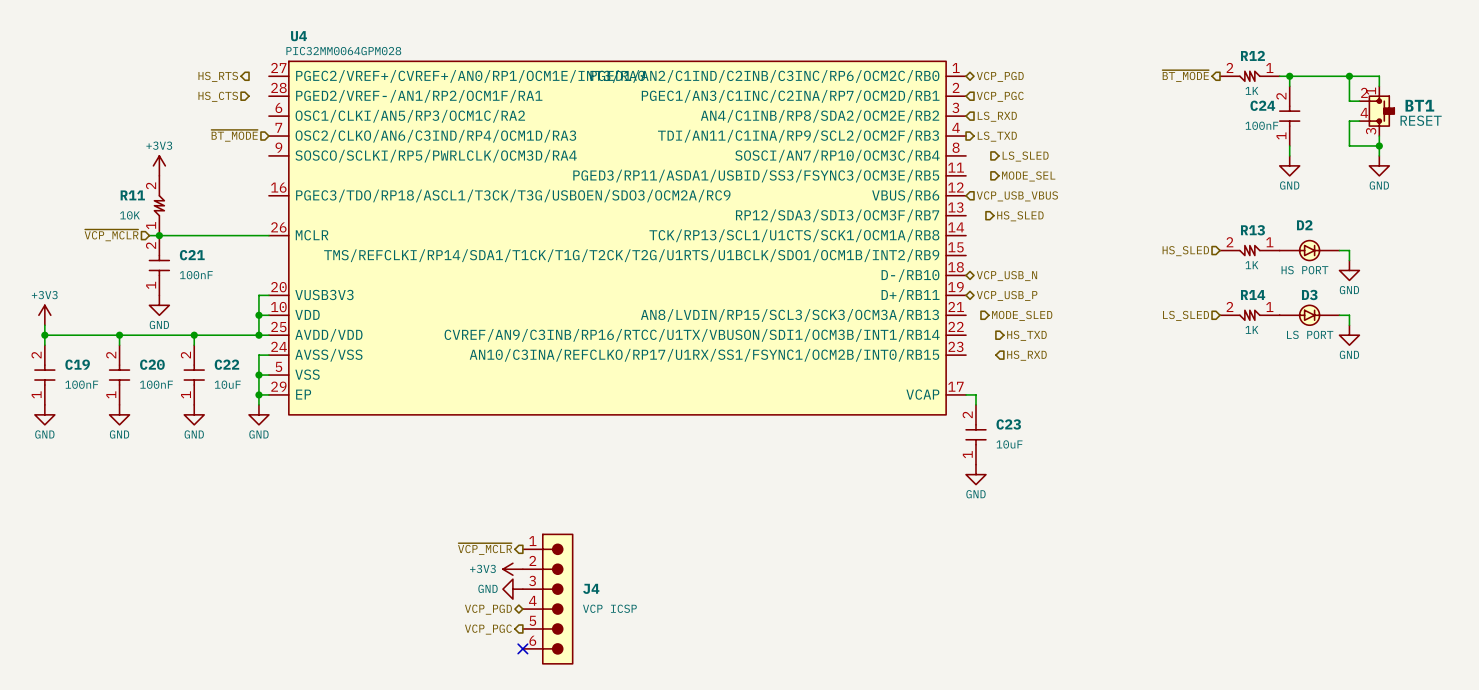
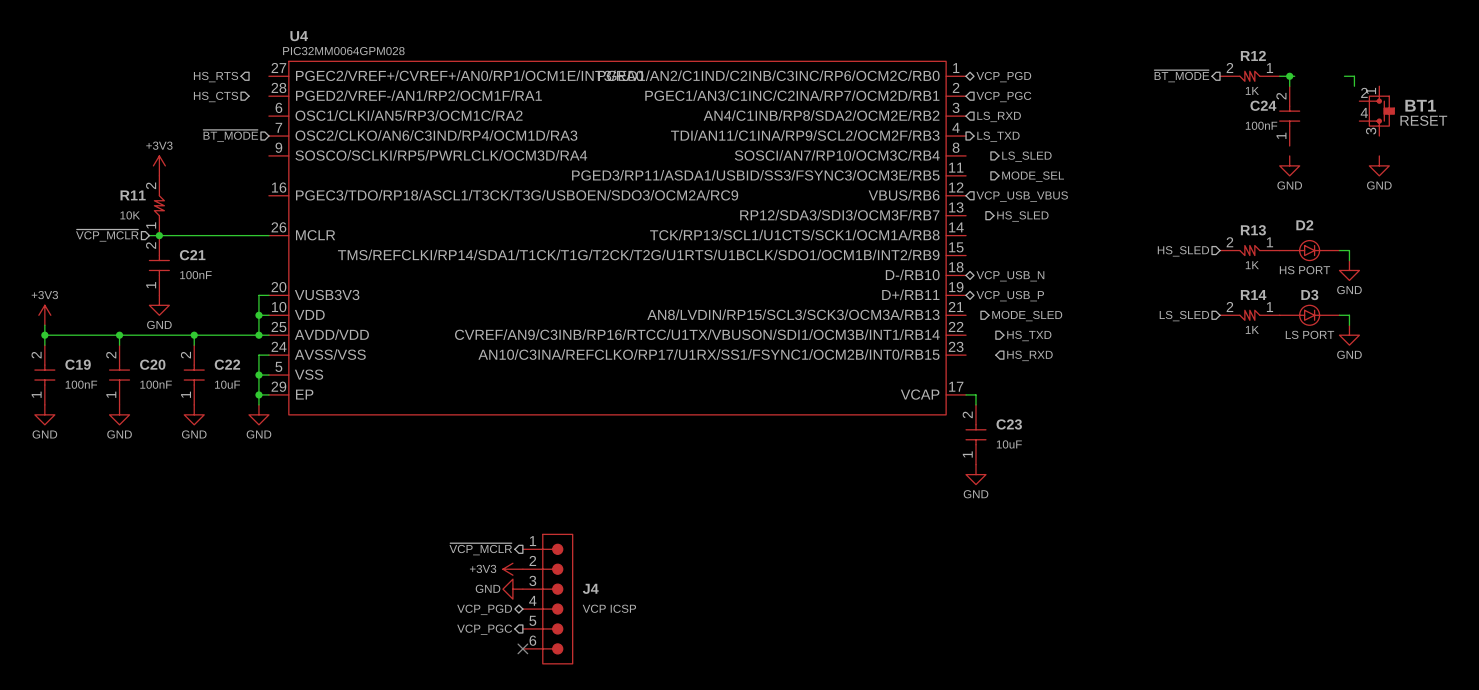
wire: (1294, 76) (1344, 76) -> none
wire: (1349, 76) (1349, 101) (1359, 101) -> none
junction: (1349, 76) -> none
wire: (1354, 76) (1379, 76) (1379, 86) -> (1354, 76) (1354, 86)
wire: (1359, 121) (1349, 121) (1349, 145) (1379, 145) -> none
wire: (1379, 136) (1379, 155) -> none
wire: (1289, 145) (1289, 155) -> none
junction: (1379, 145) -> none

